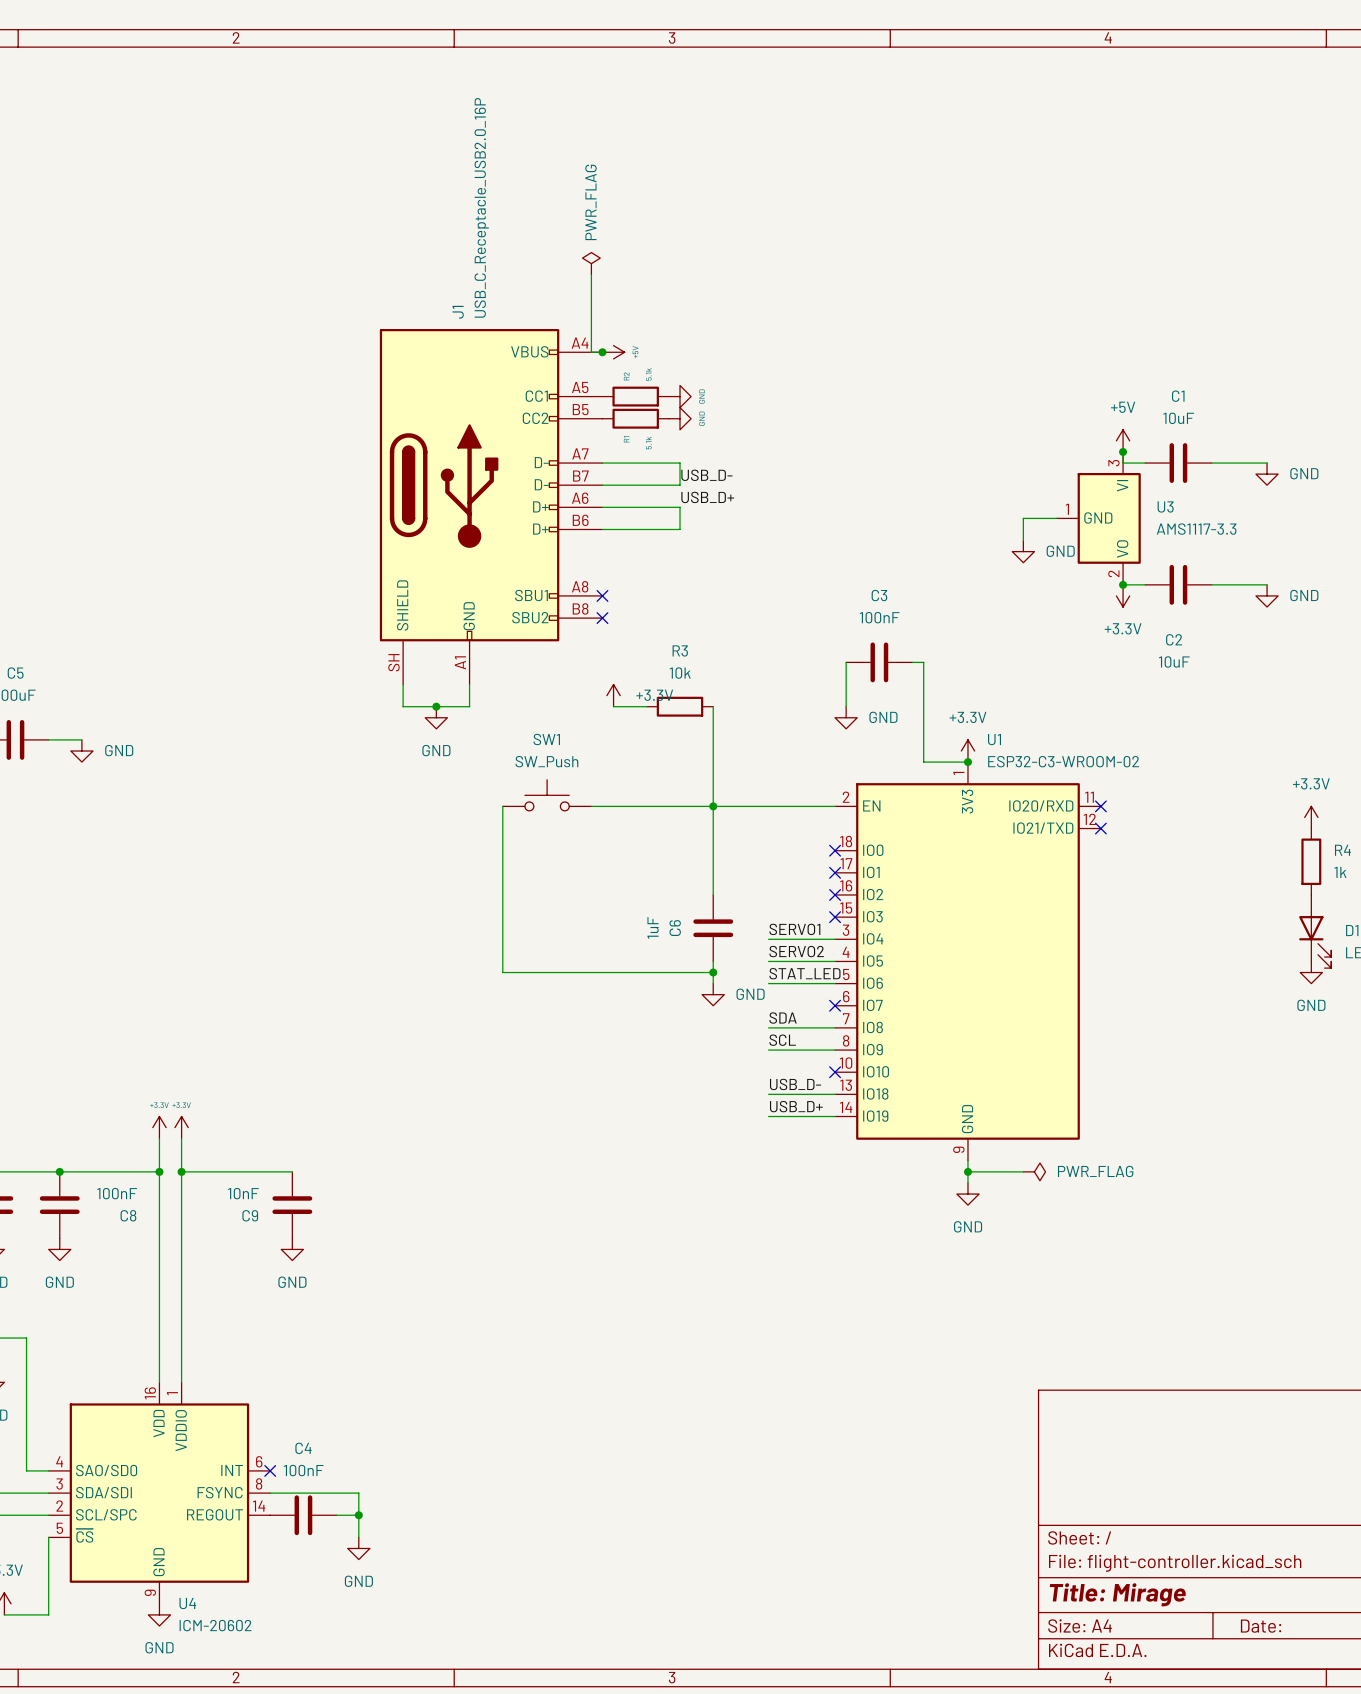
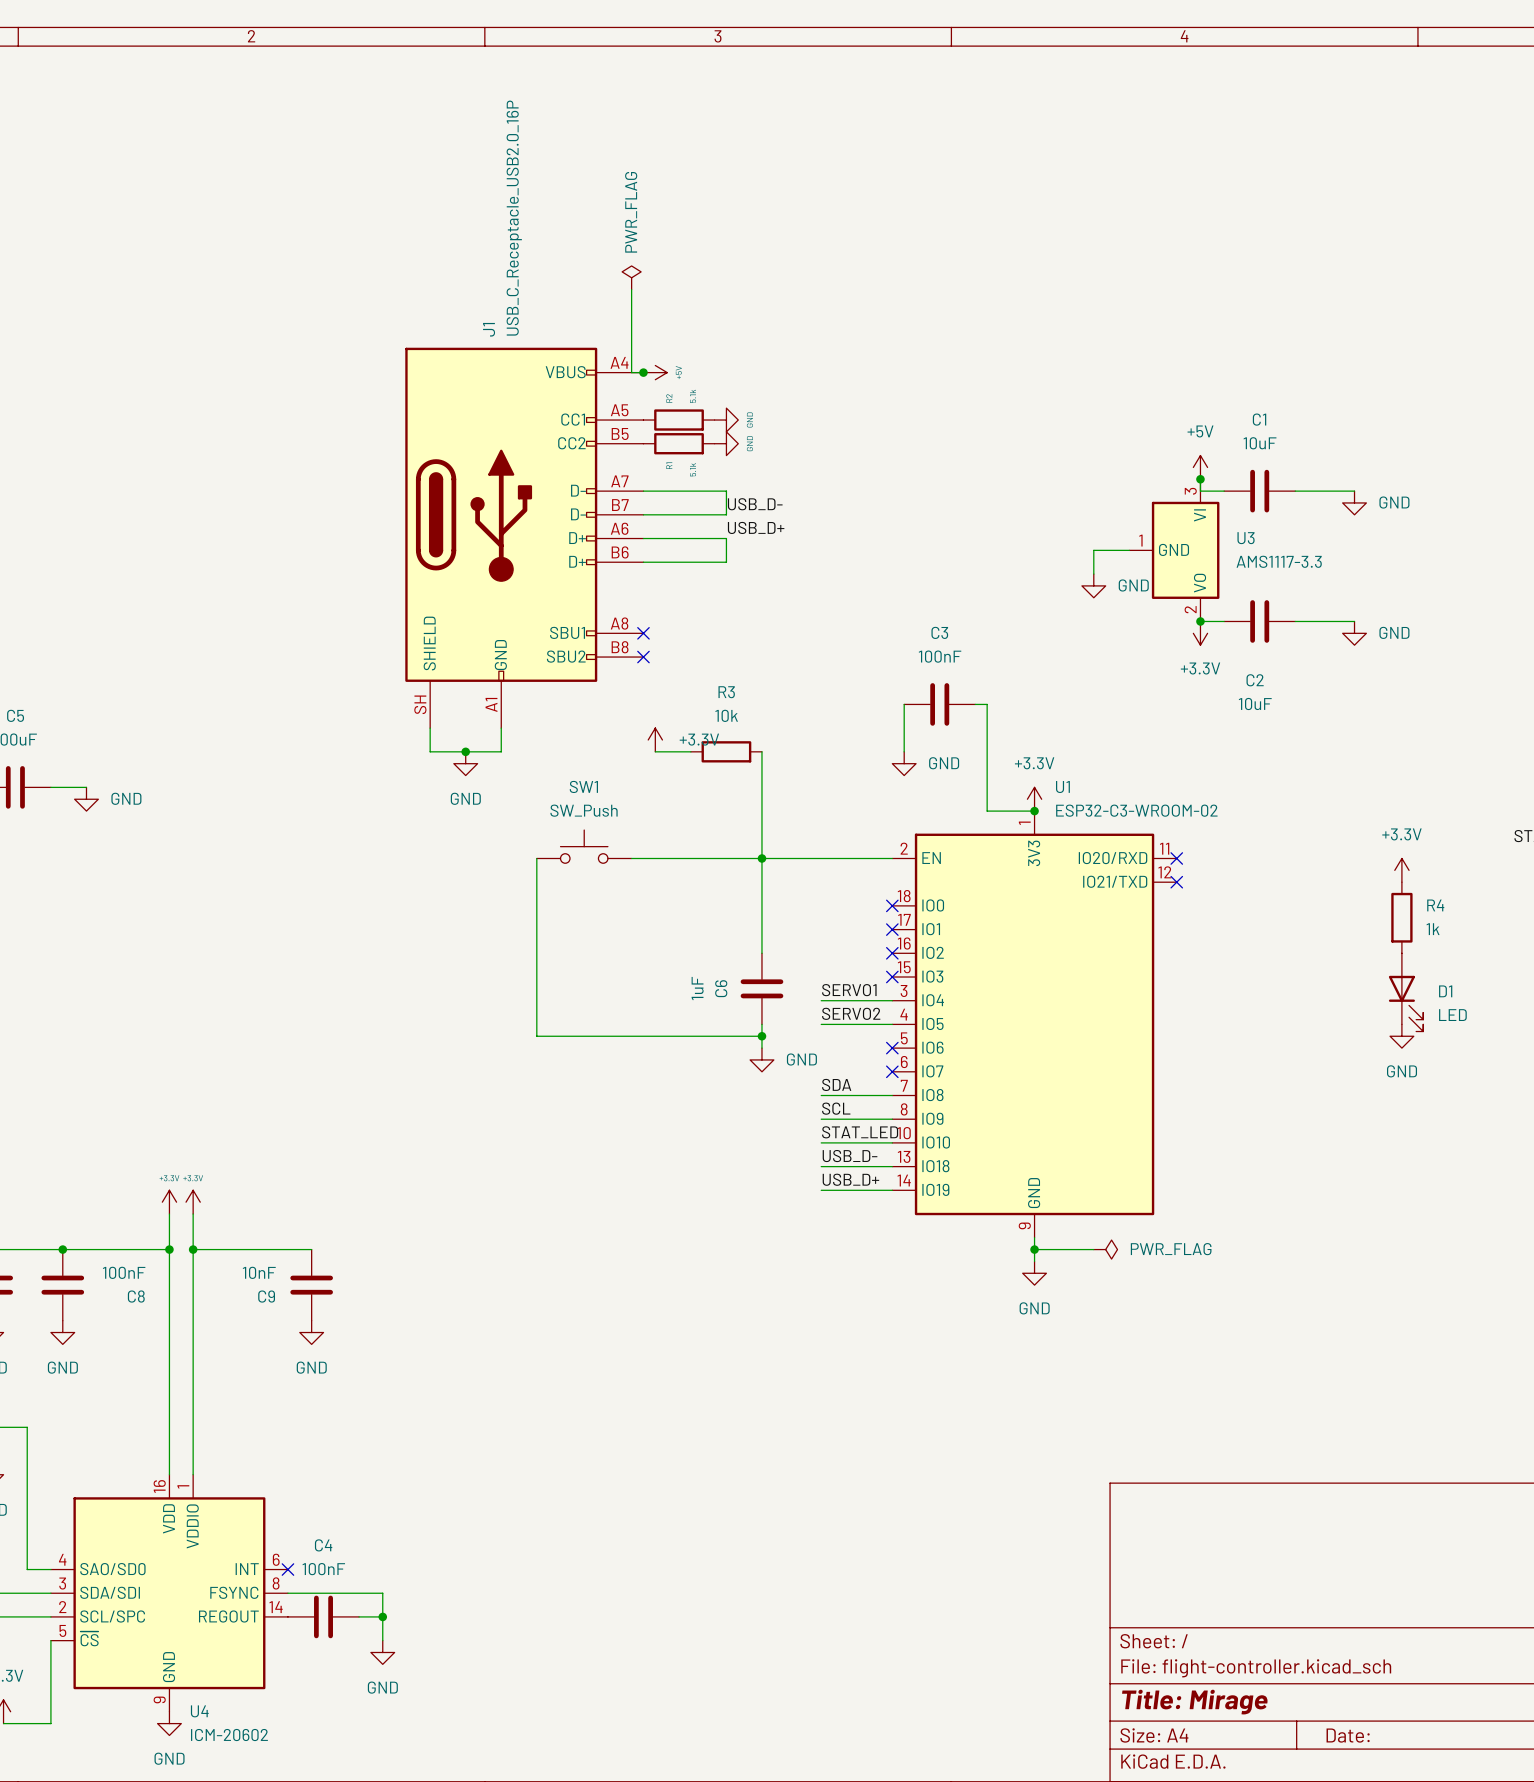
label position: STAT_LED (804, 973) -> STAT_LED (860, 1132)
wire: (768, 983) (835, 983) -> (821, 1142) (892, 1142)
no-connect mark: none -> (892, 1048)
no-connect mark: (835, 1072) -> none

